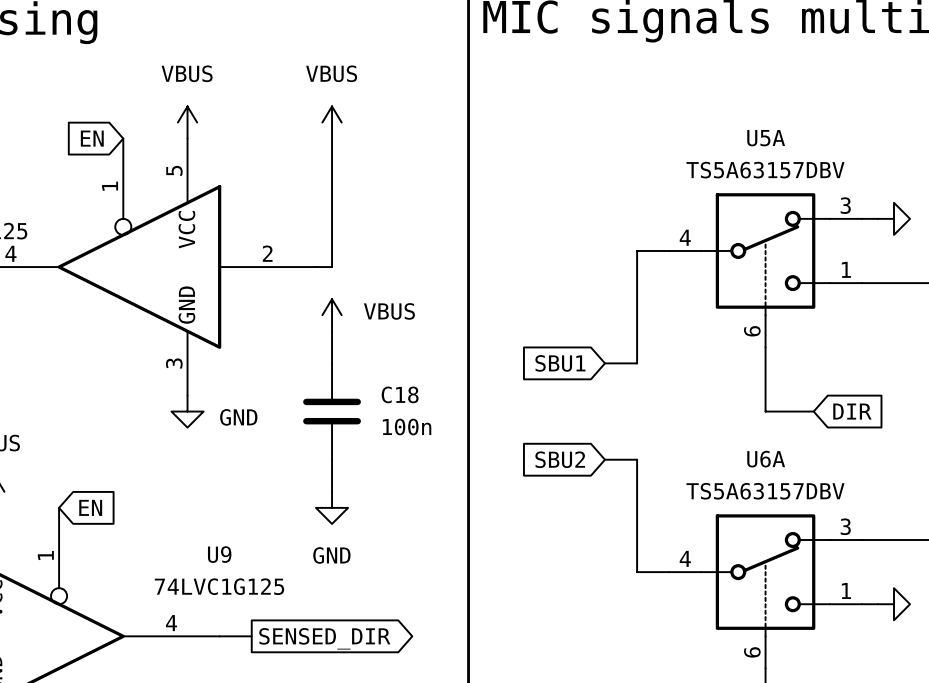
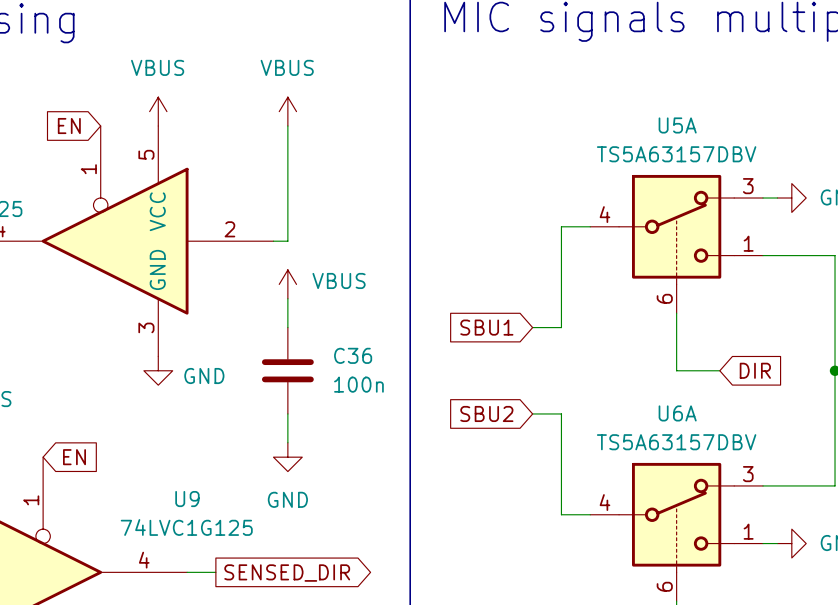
C18 name: C18 (400, 394) -> C36 (353, 355)

